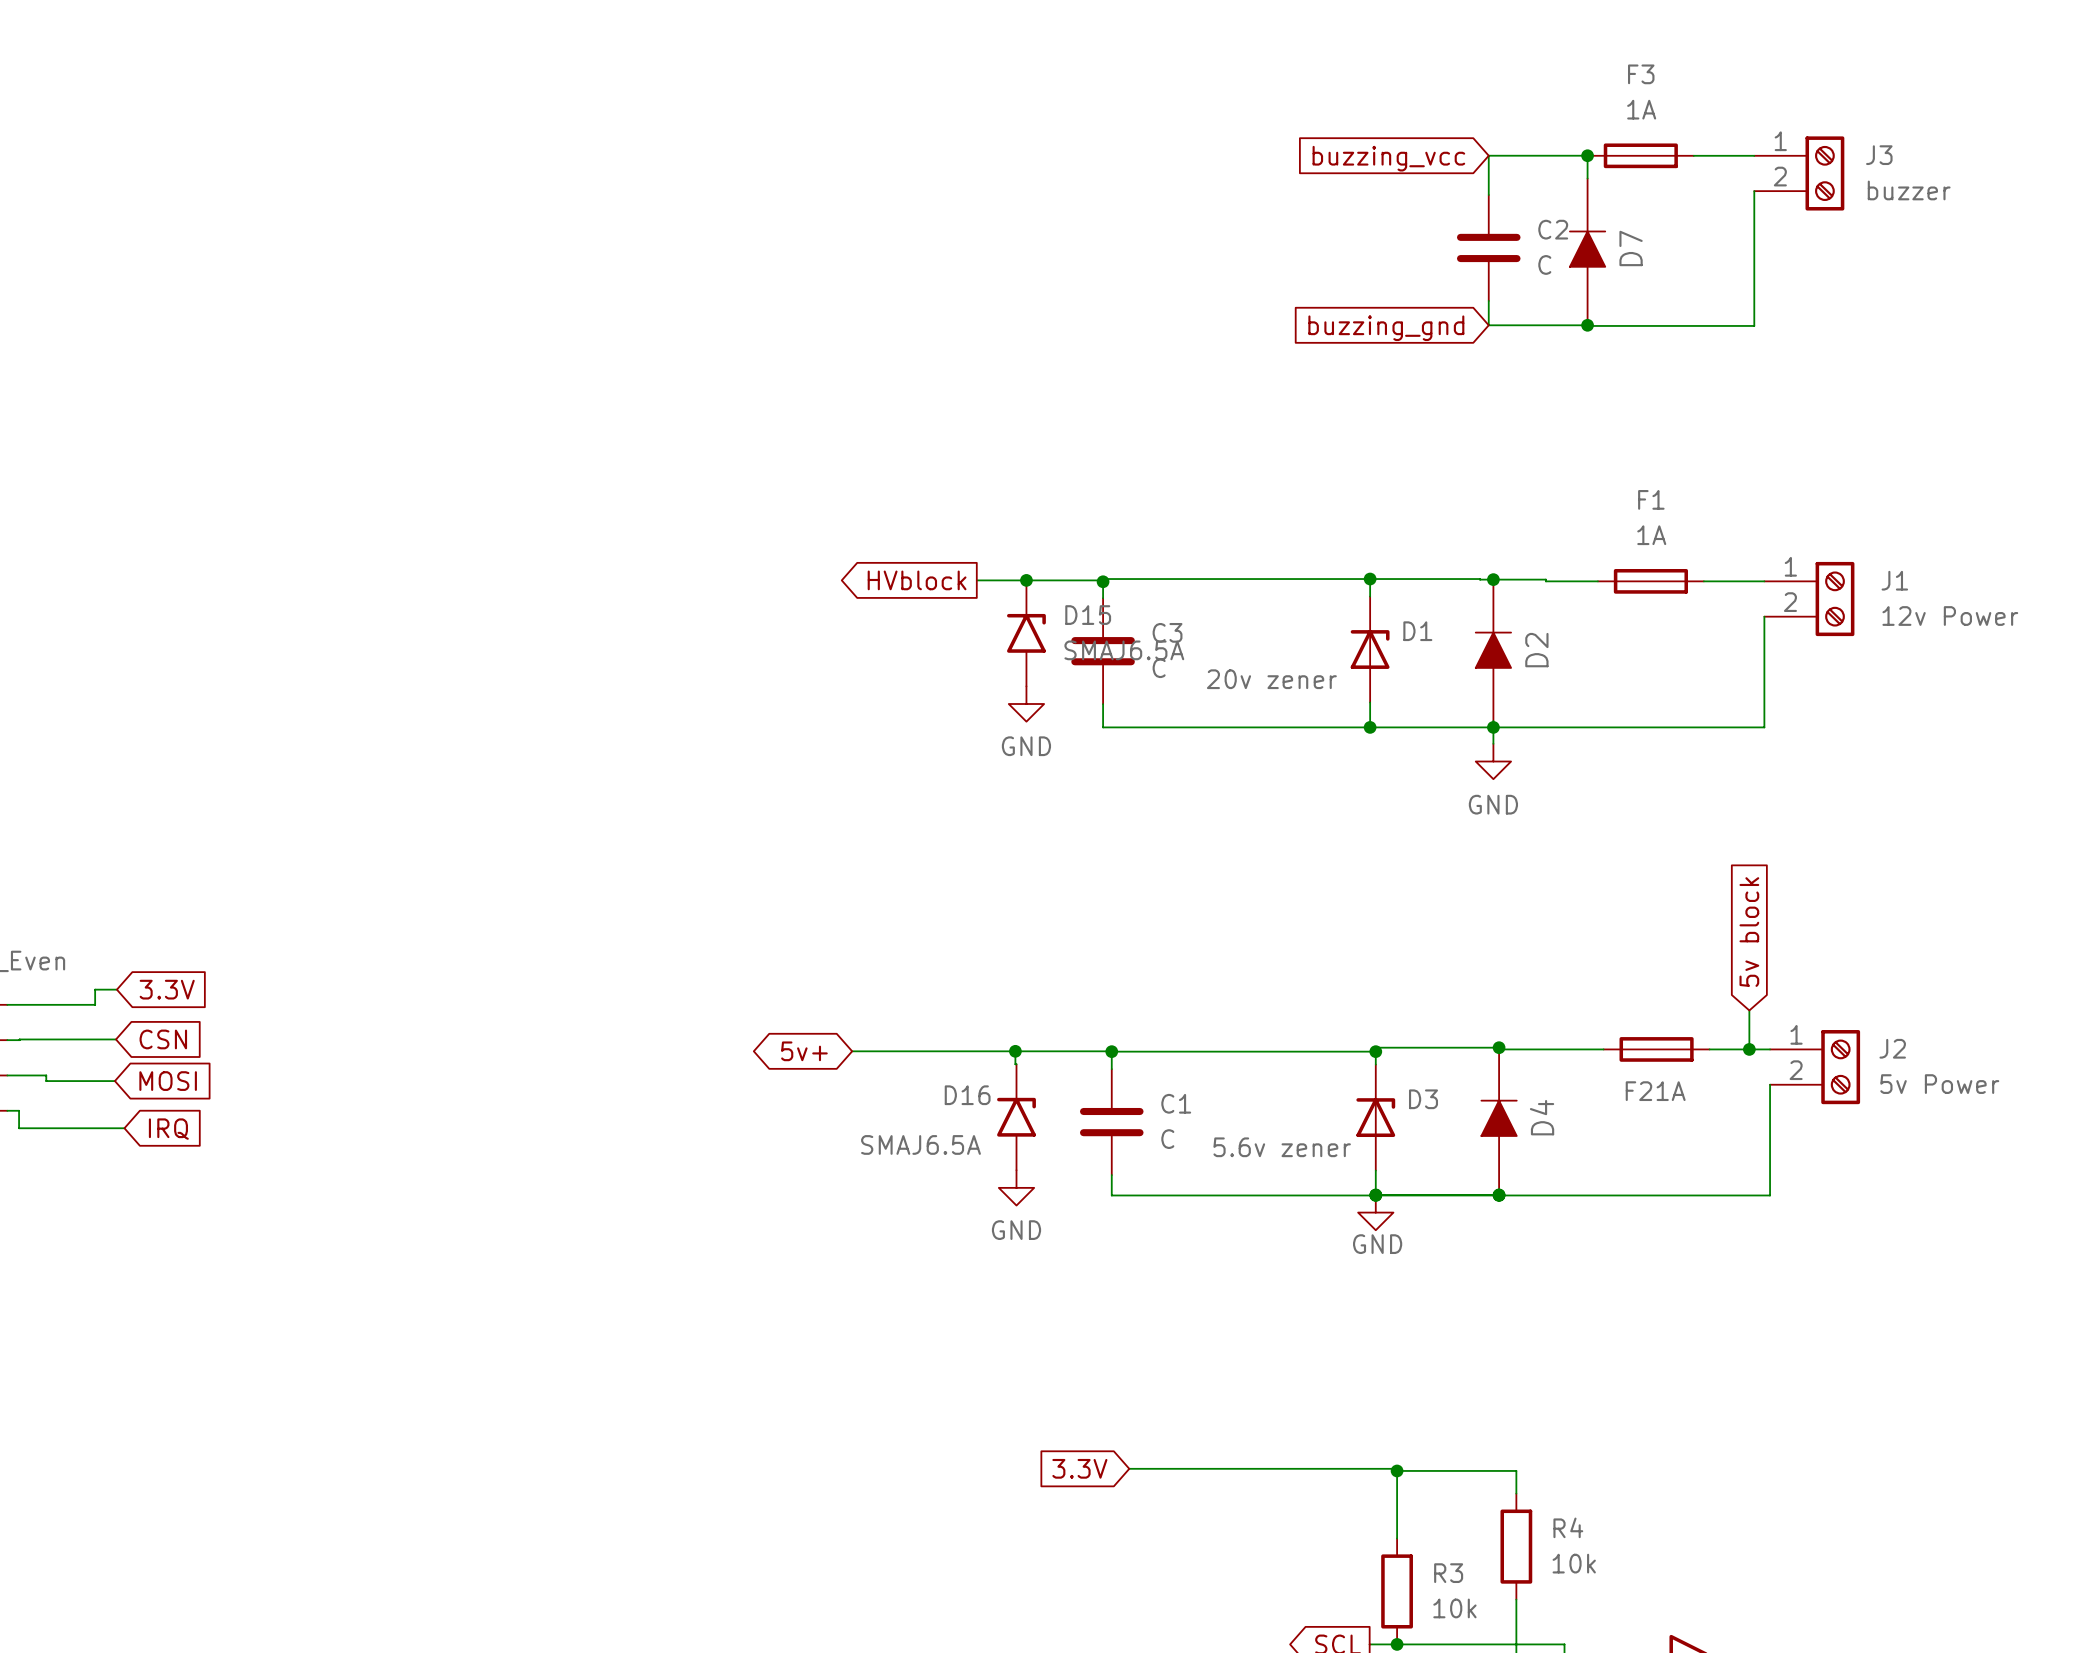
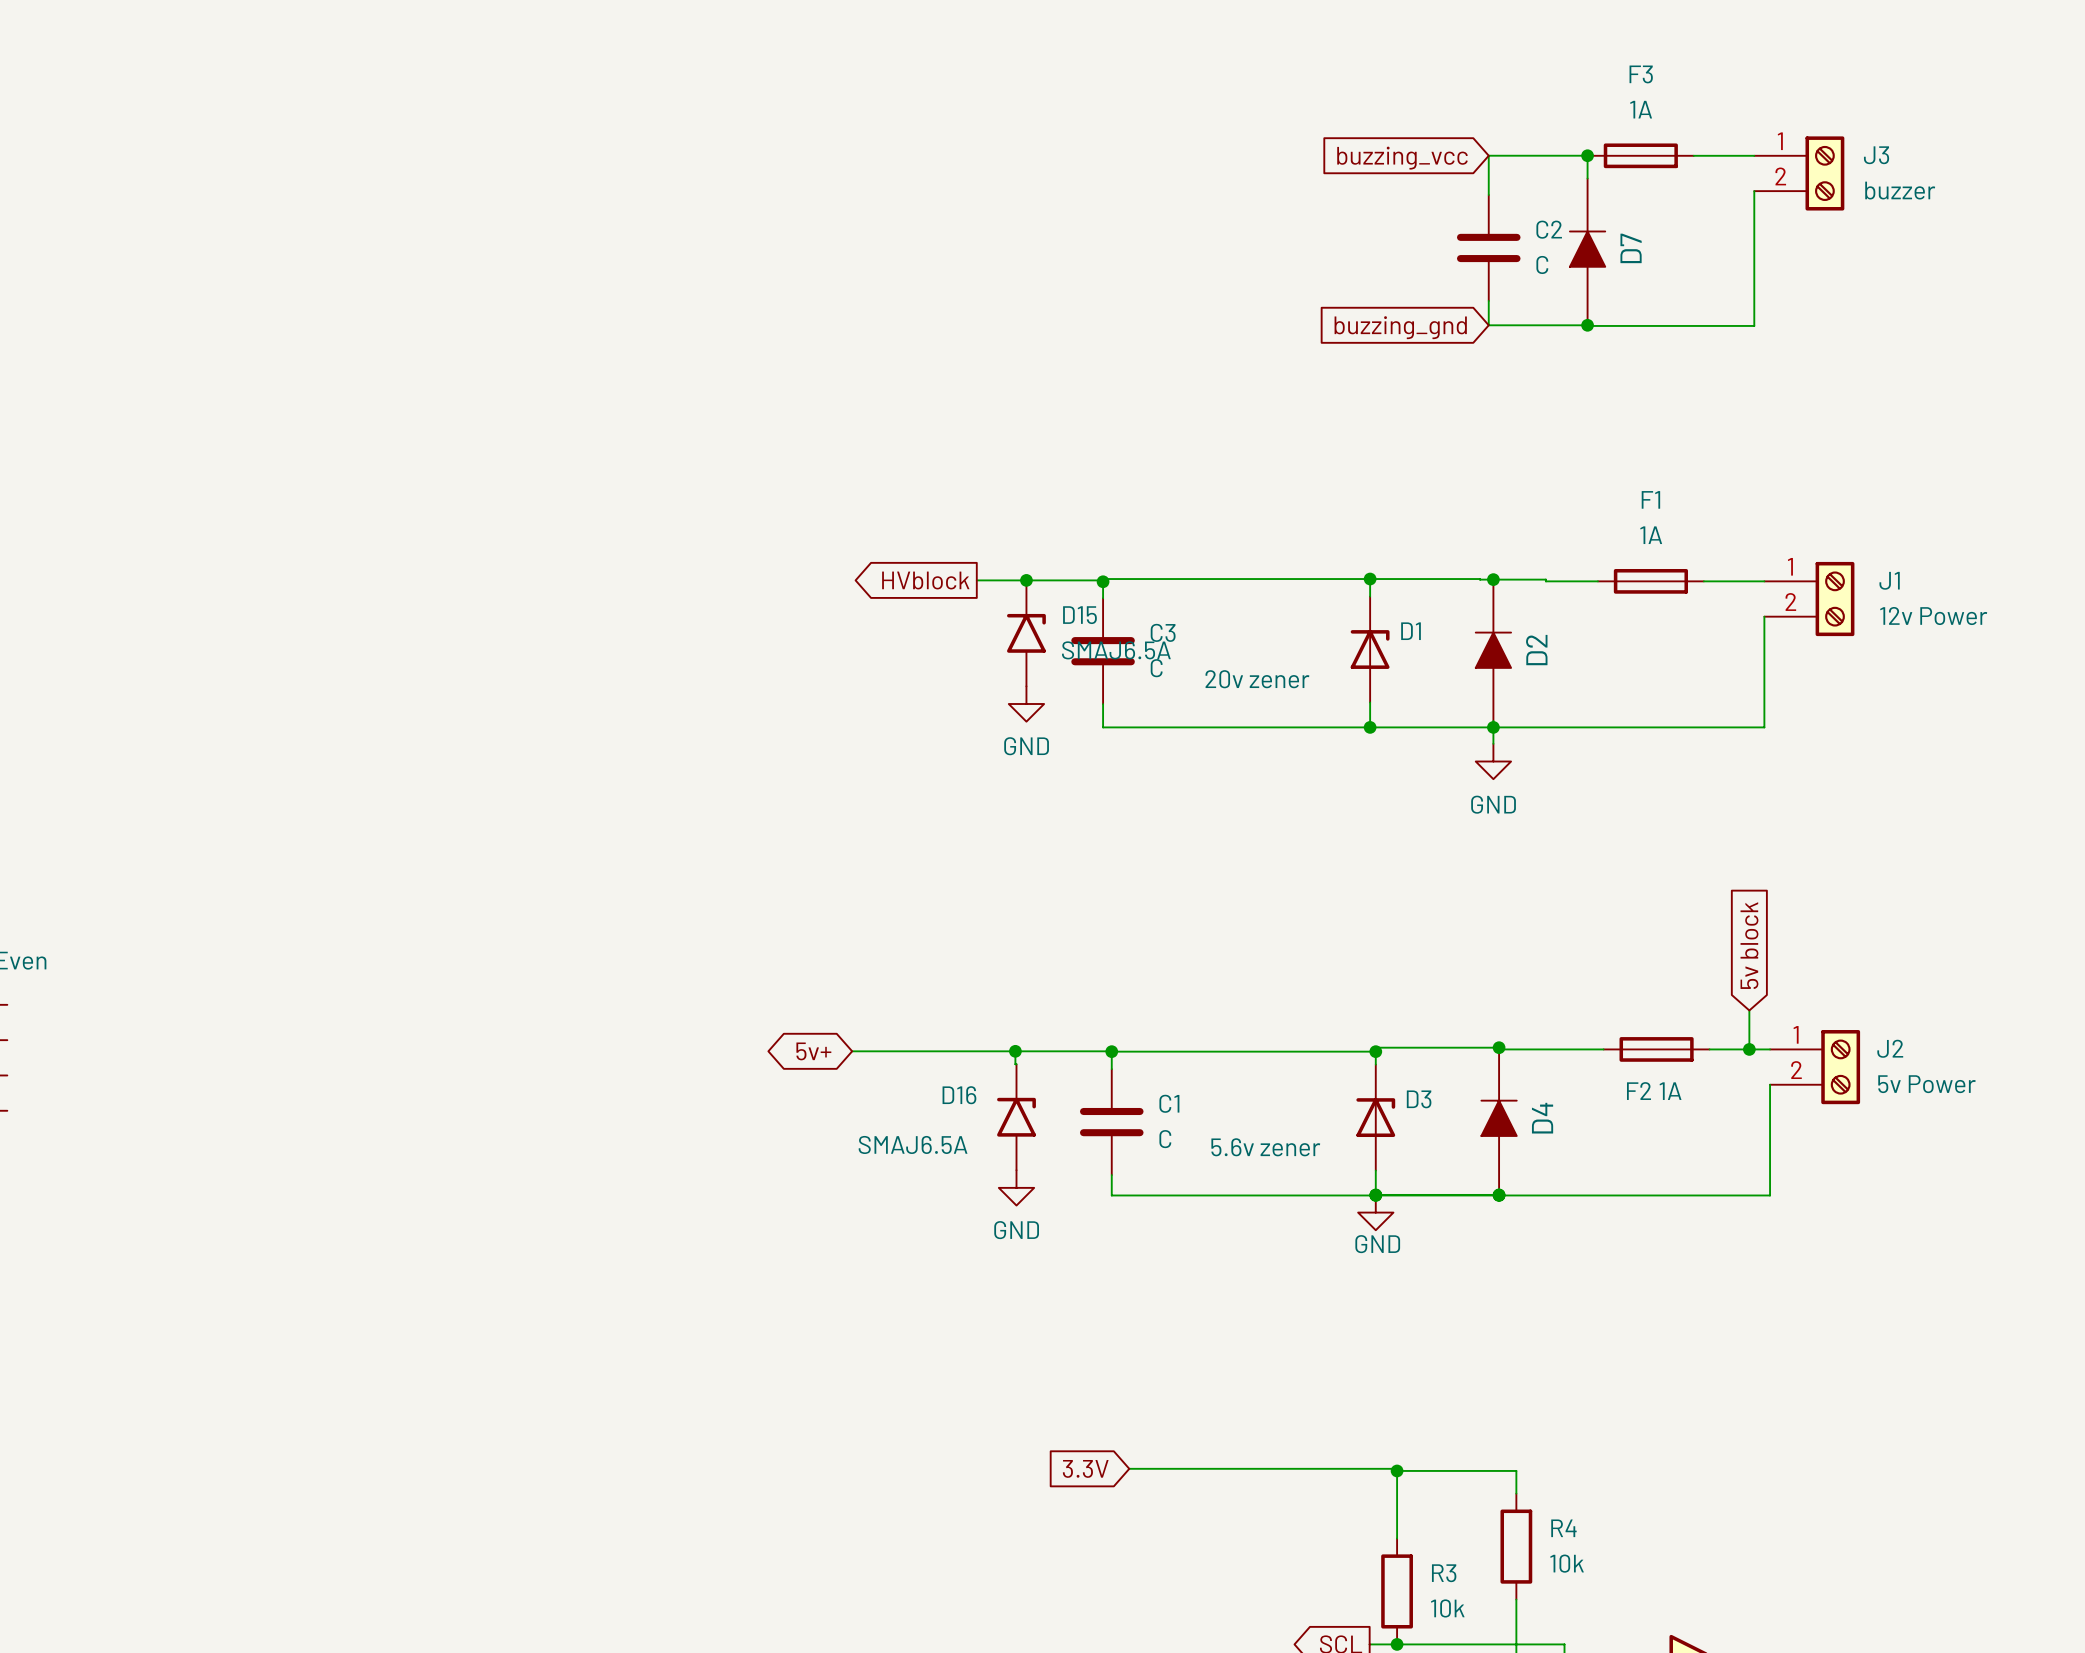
wire: (116, 989) (95, 989) (95, 1004) (7, 1004) -> none
global label: 3.3V (167, 989) -> none
wire: (115, 1039) (7, 1040) -> none
global label: CSN (163, 1039) -> none
wire: (7, 1075) (46, 1075) (46, 1081) (114, 1081) -> none
global label: MOSI (168, 1081) -> none
wire: (7, 1110) (19, 1110) (19, 1128) (124, 1128) -> none
global label: IRQ (168, 1129) -> none

